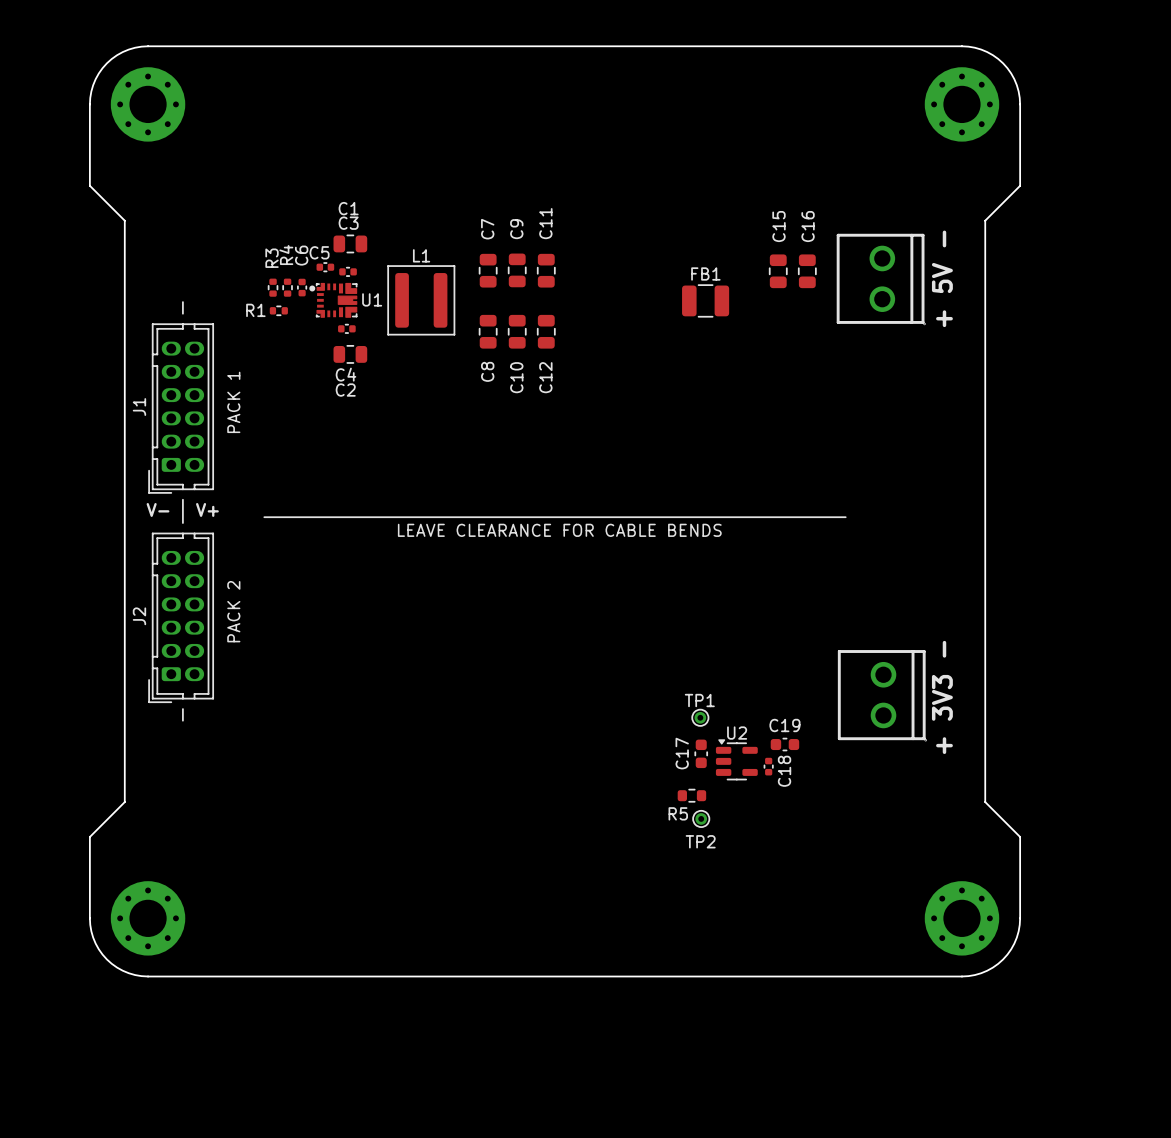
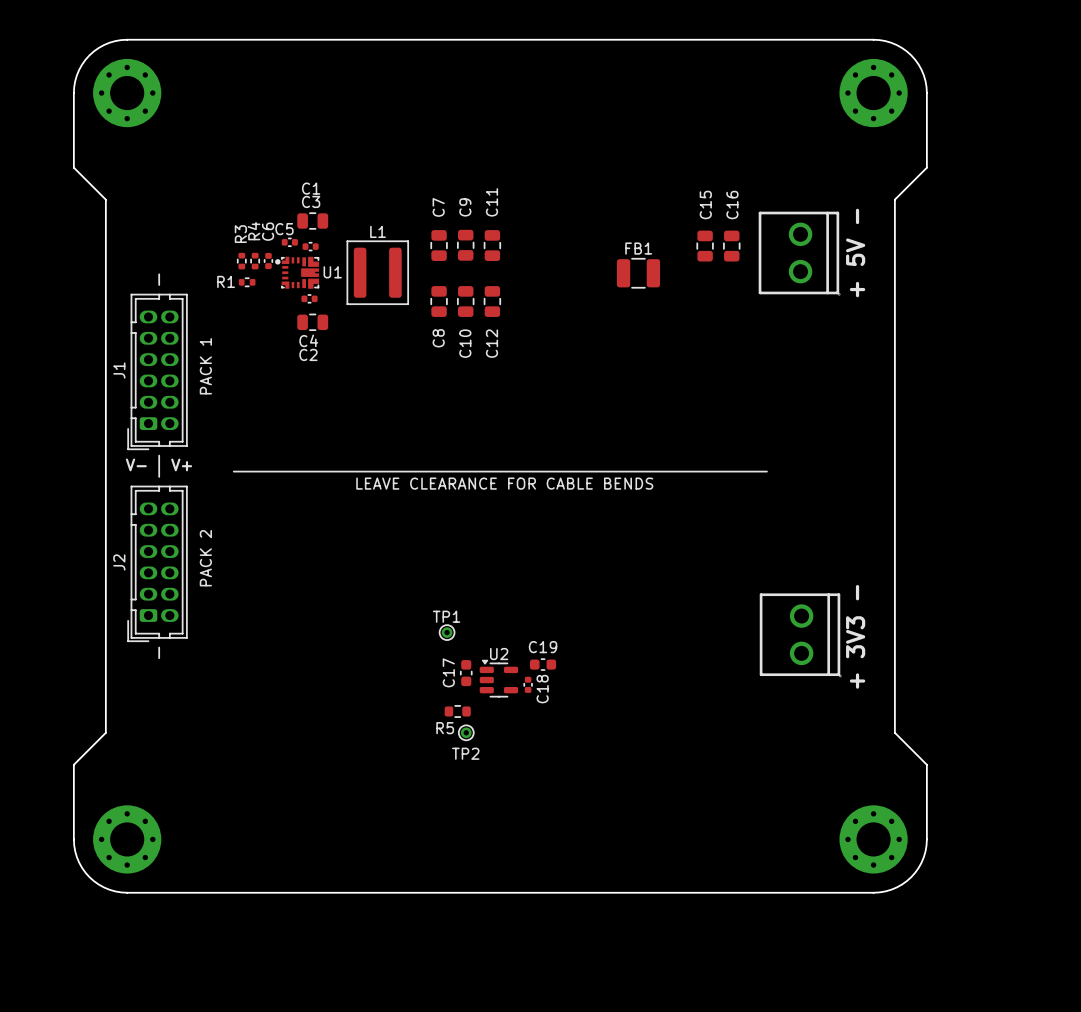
TP1 position: (700, 717) -> (447, 632)
C19 position: (784, 744) -> (543, 664)
C17 position: (701, 753) -> (466, 673)
U2 position: (736, 759) -> (498, 678)
C18 position: (768, 766) -> (528, 684)
R5 position: (691, 795) -> (457, 711)
TP2 position: (701, 818) -> (466, 732)

